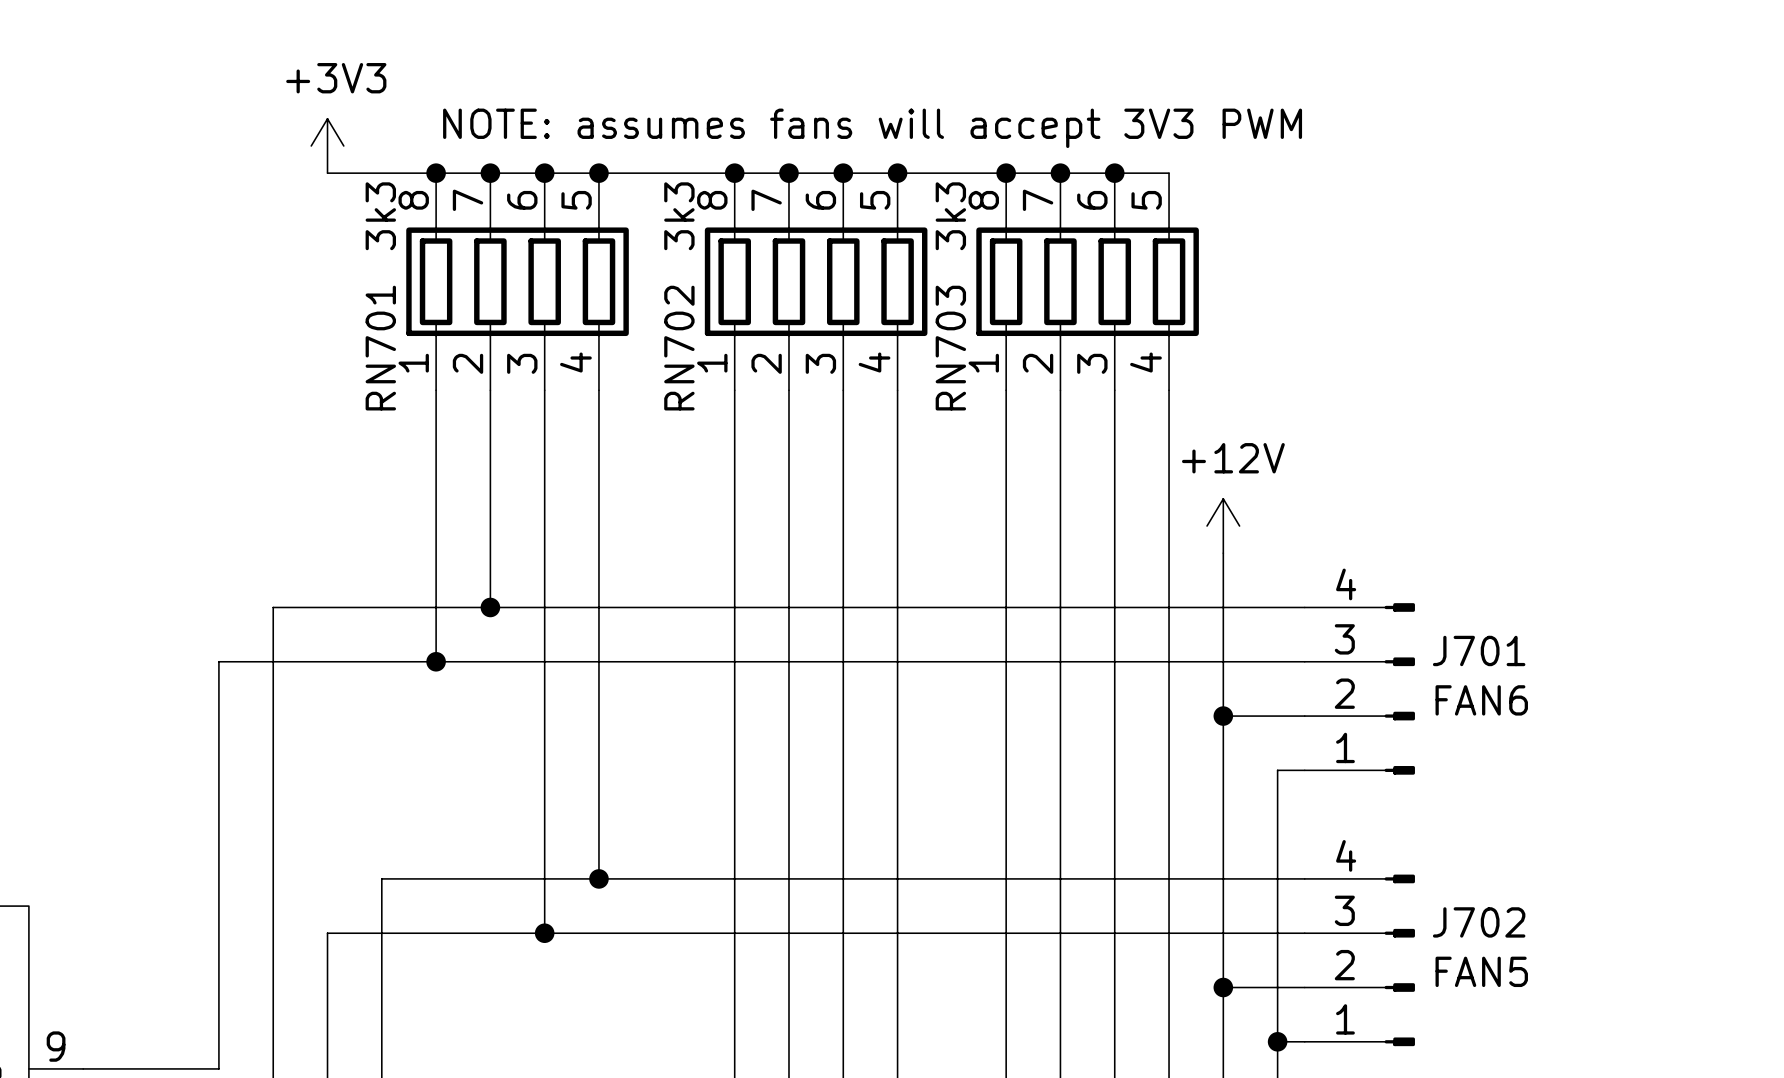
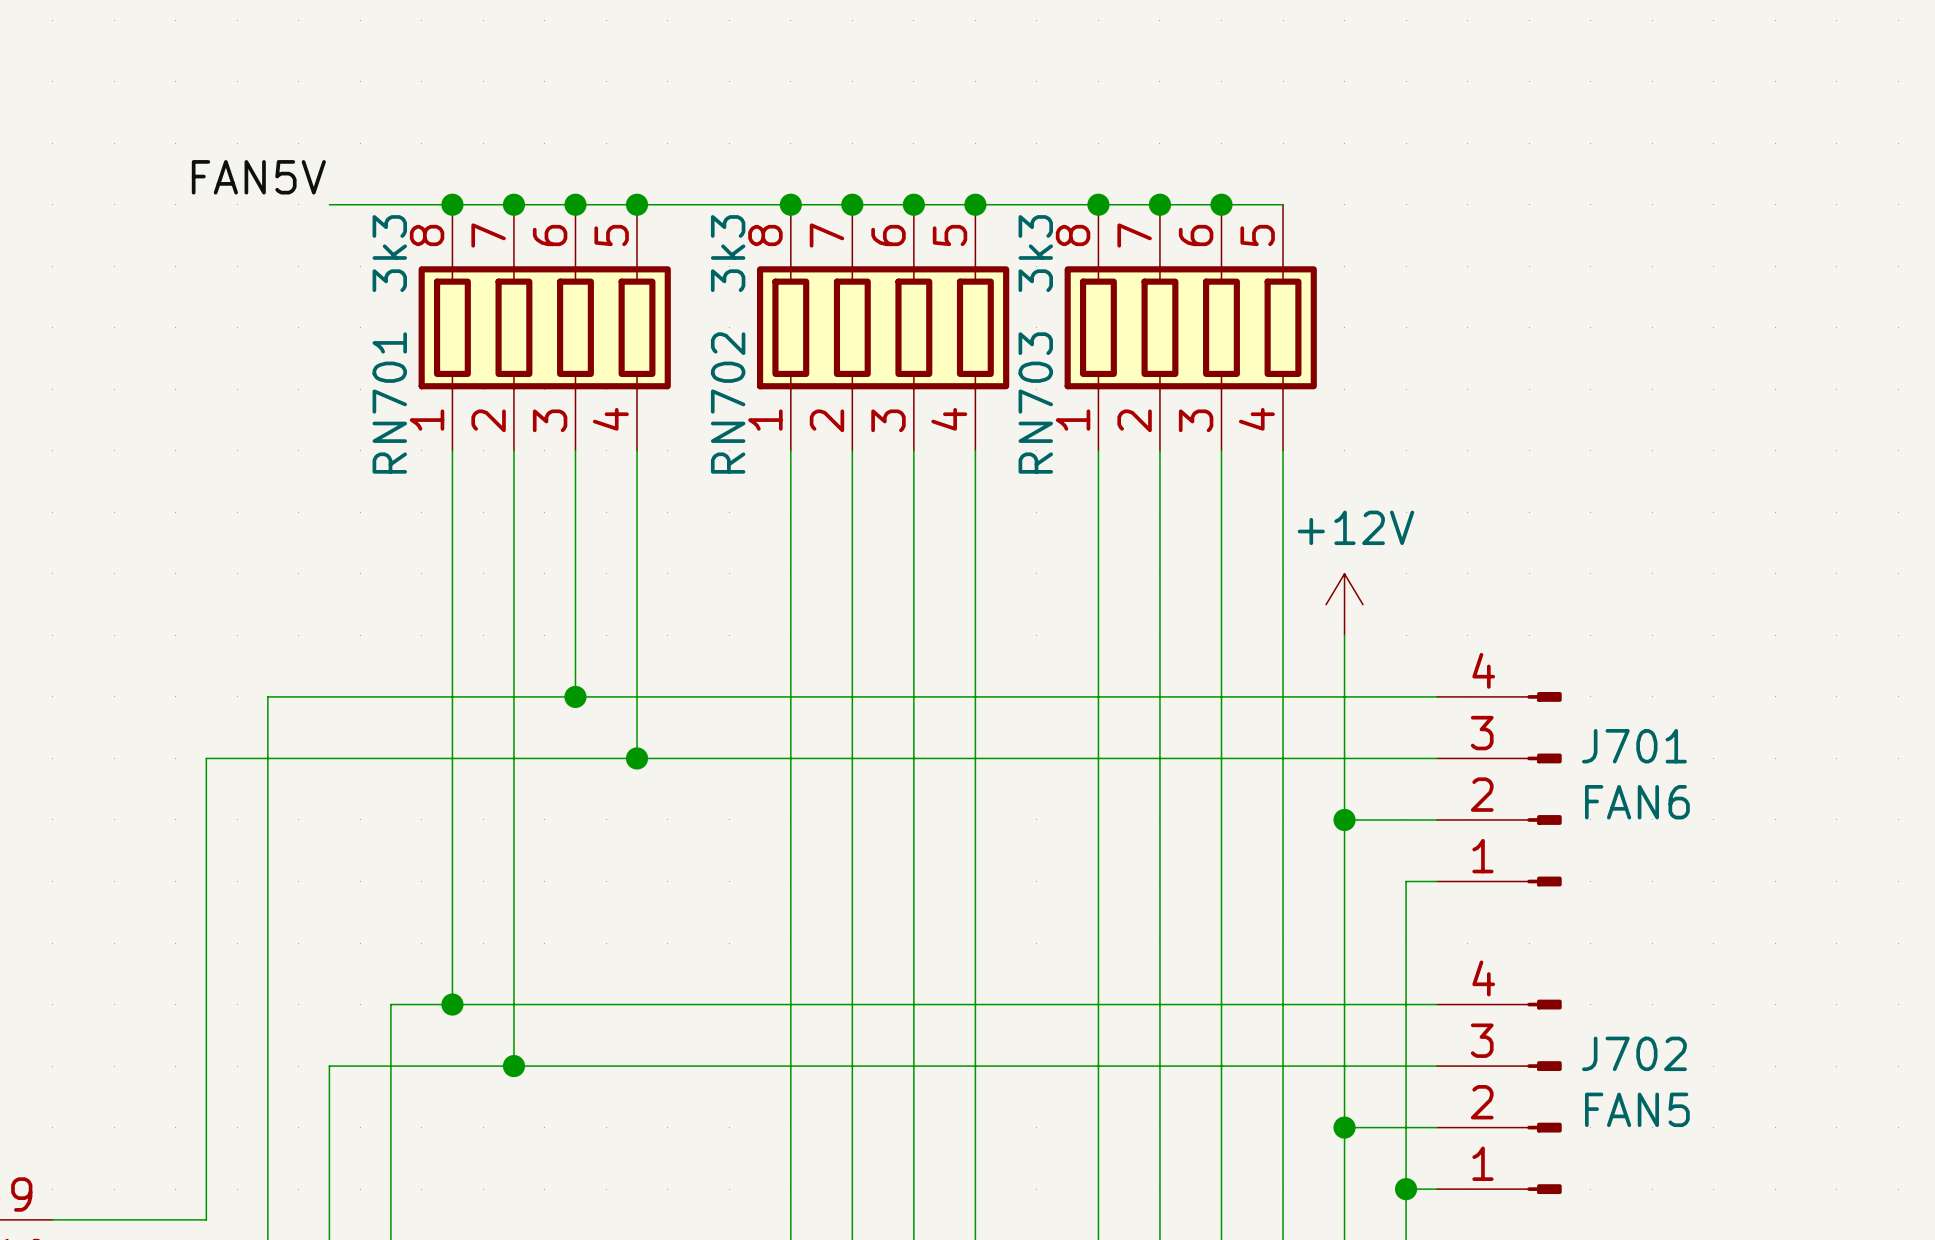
text: NOTE: assumes fans will accept 3V3 PWM (872, 128) -> none
power symbol: +3V3 (327, 146) -> none
label: none -> FAN5V (258, 177)
junction position: (490, 607) -> (575, 696)
wire: (544, 607) (544, 933) -> (513, 696) (513, 1066)
junction: (436, 661) -> none
wire: (598, 661) (598, 878) -> (452, 758) (452, 1004)
junction: none -> (637, 758)
junction: none -> (452, 1004)
junction: (598, 878) -> none
junction position: (544, 933) -> (513, 1066)

